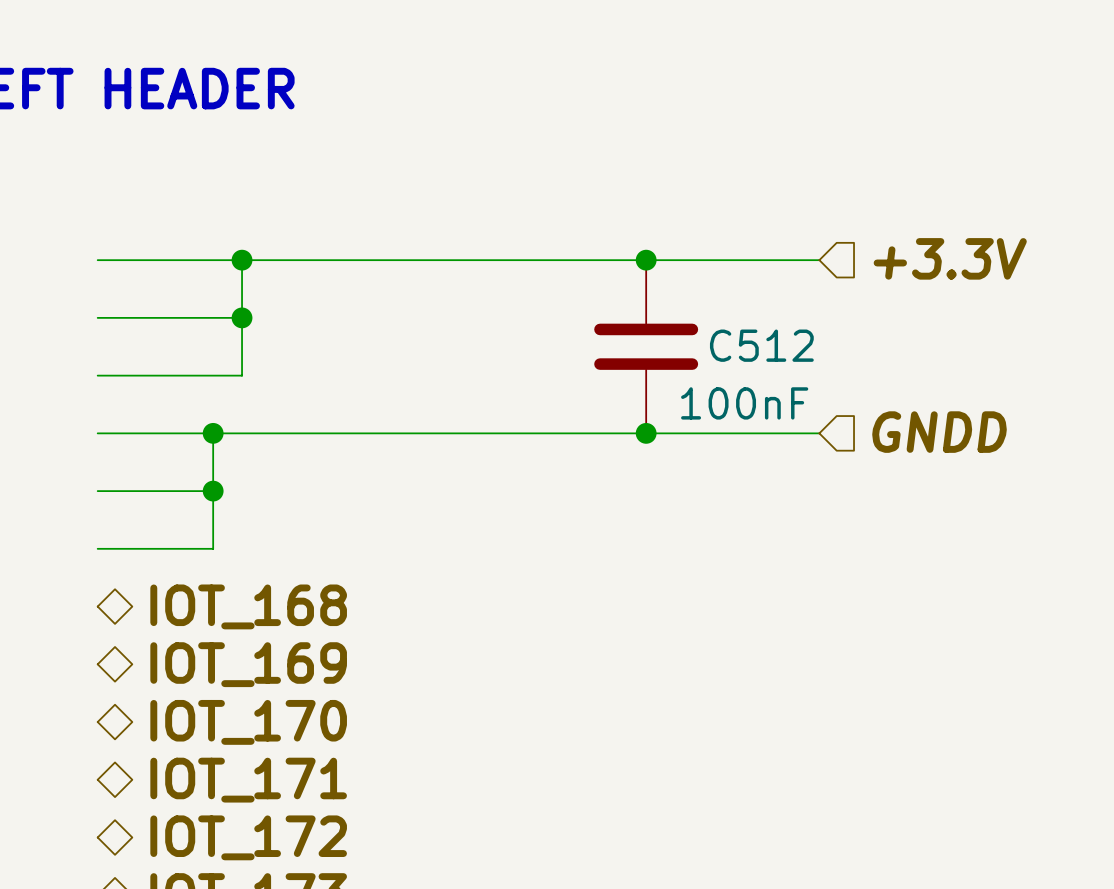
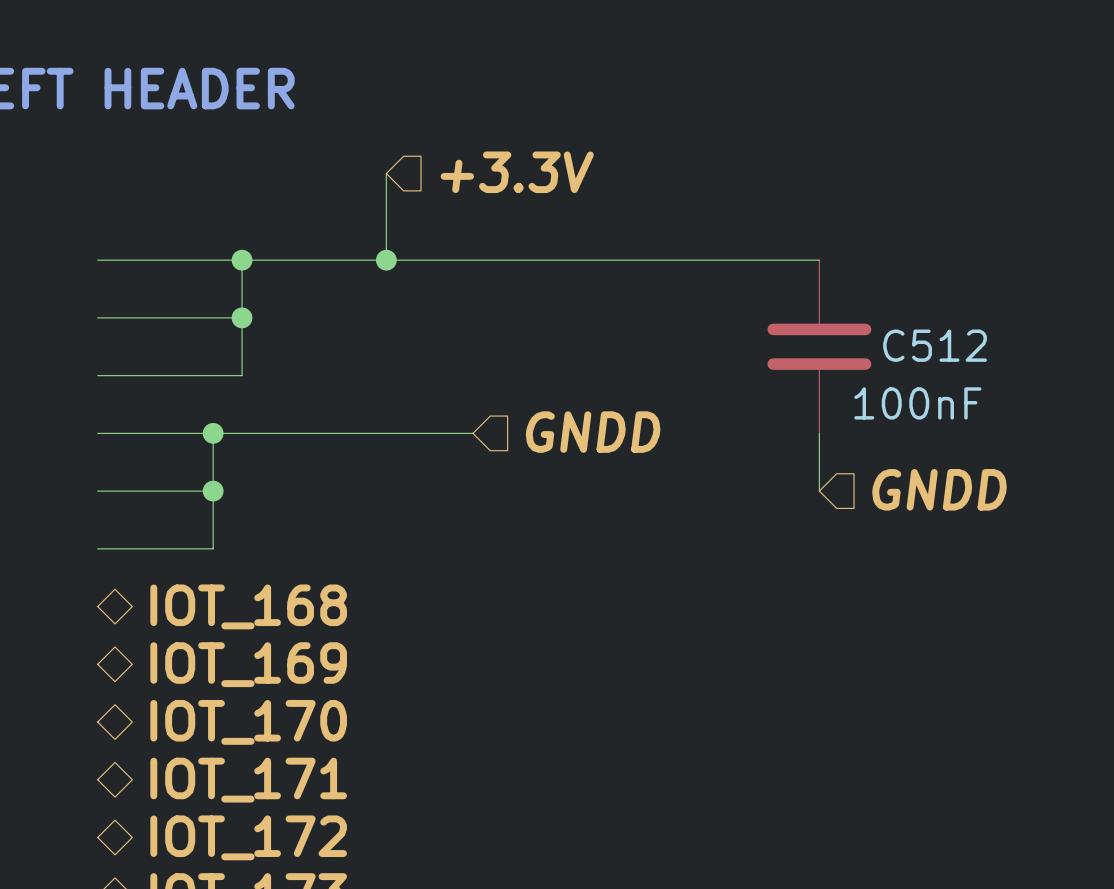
wire: none -> (386, 173) (386, 260)
hierarchical label position: +3.3V (950, 258) -> +3.3V (517, 172)
junction: none -> (386, 260)
junction: (646, 260) -> none
C512 position: (646, 346) -> (819, 346)
hierarchical label: none -> GNDD (593, 432)
hierarchical label position: GNDD (939, 432) -> GNDD (939, 489)
wire: (472, 433) (819, 433) -> (819, 491) (819, 433)
junction: (646, 433) -> none

